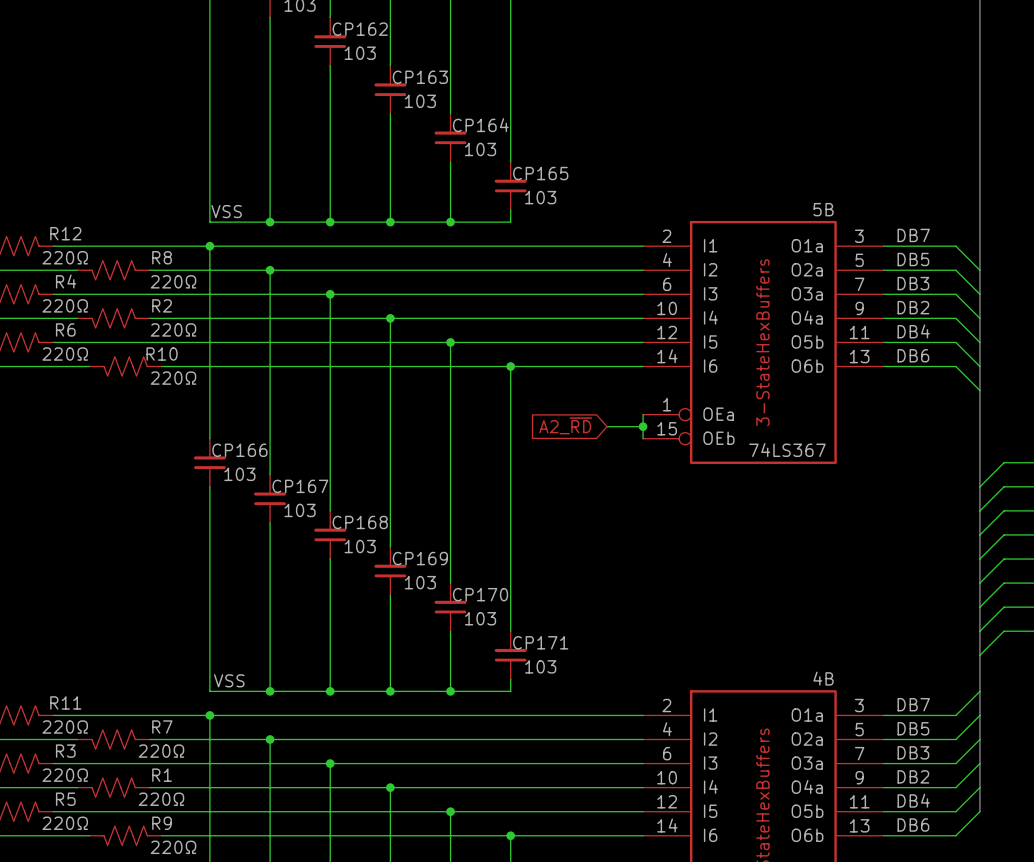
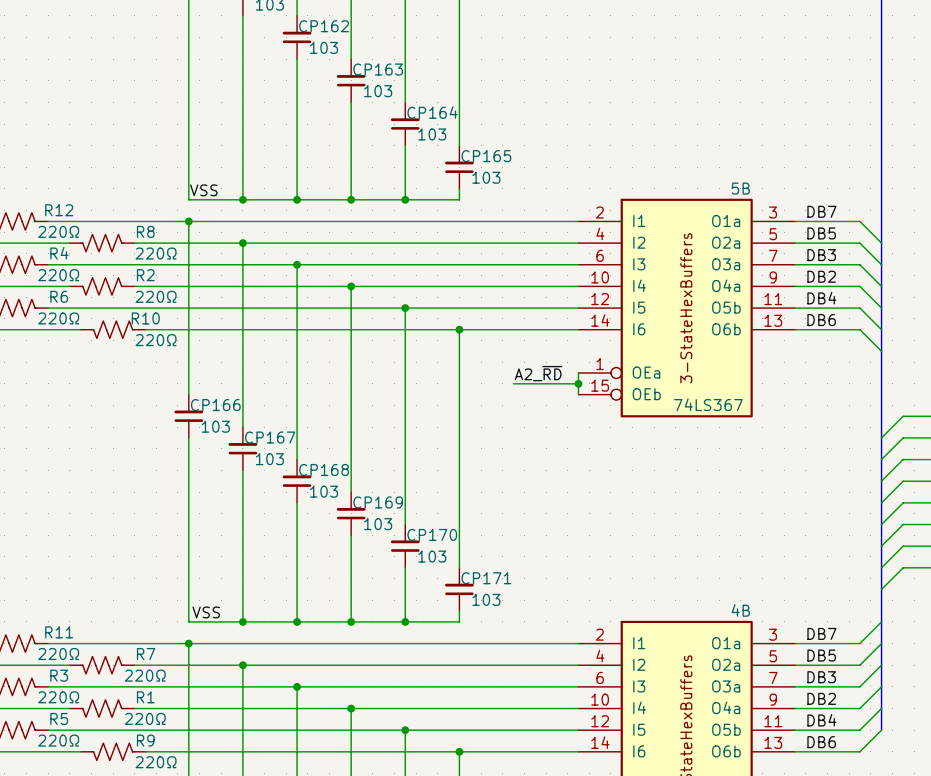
label: none -> A2_~{RD} (538, 373)
global label: A2_~{RD} (565, 425) -> none
wire: none -> (513, 383) (546, 383)

